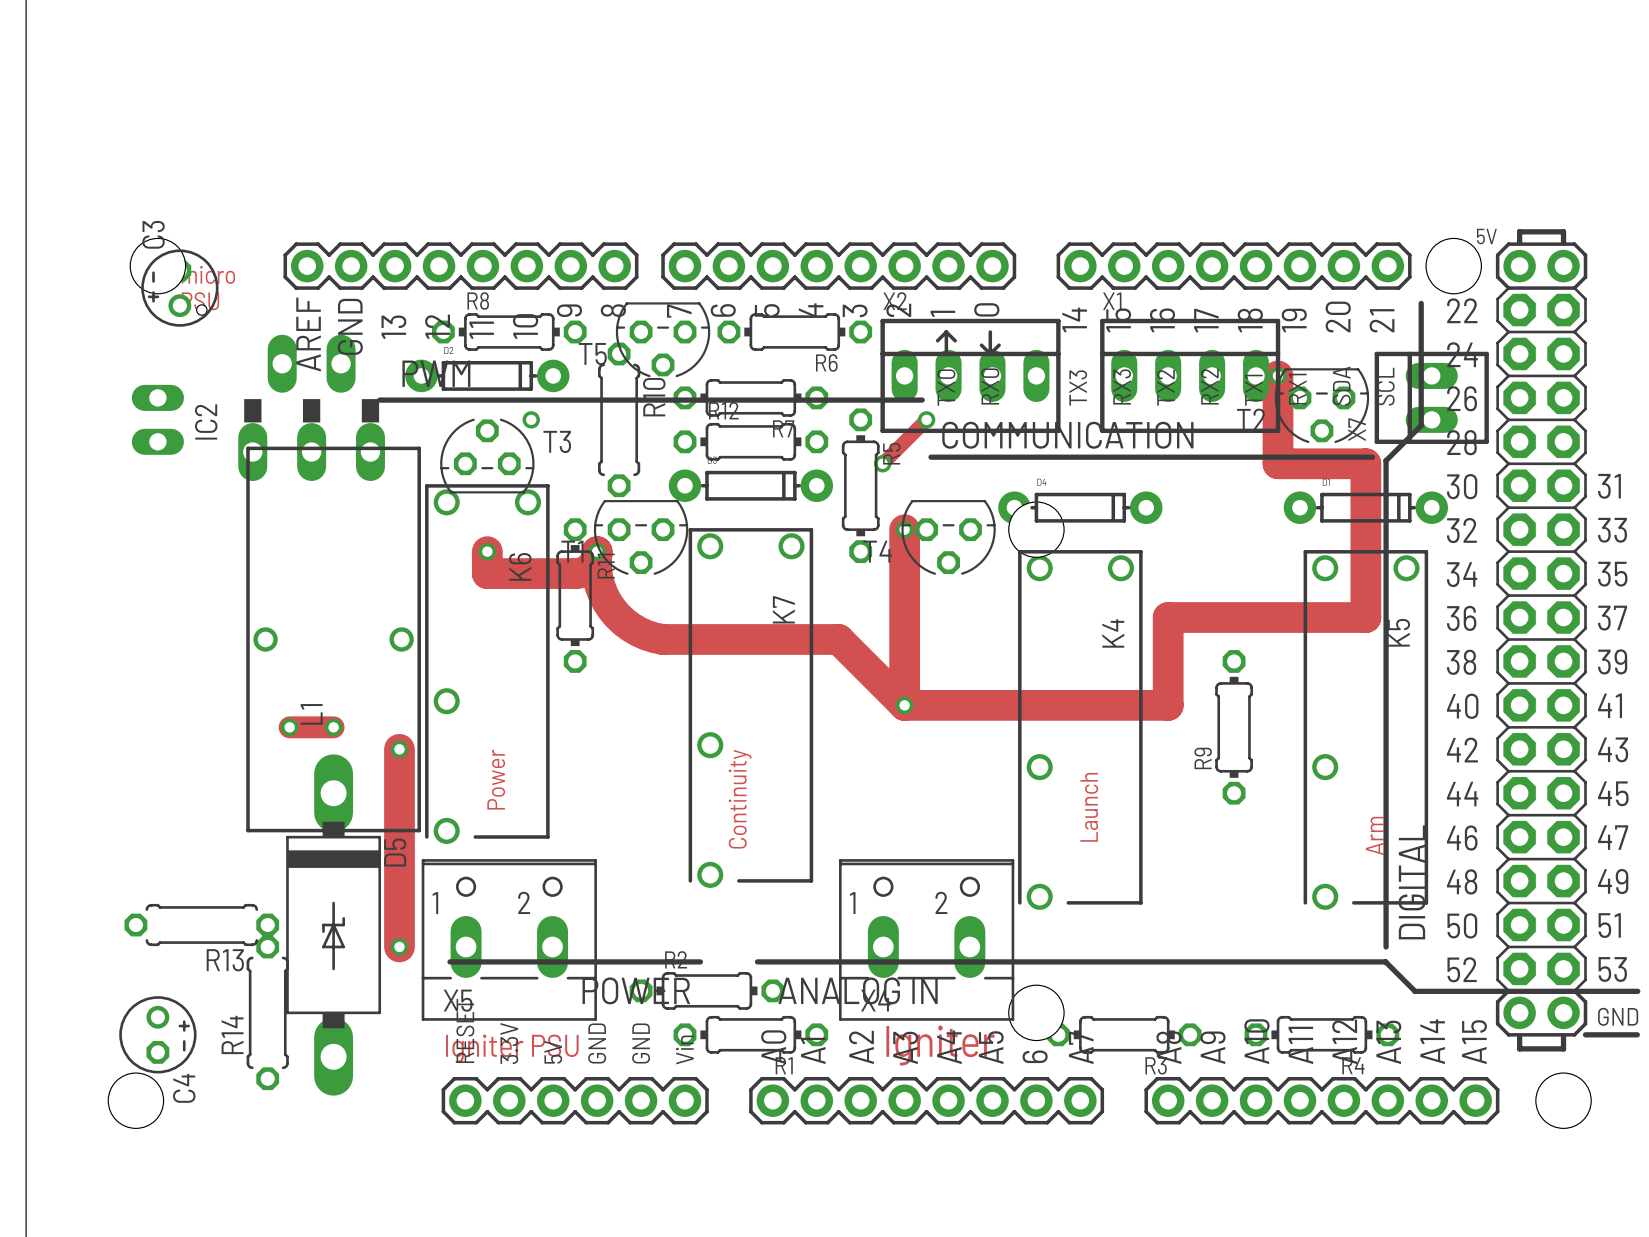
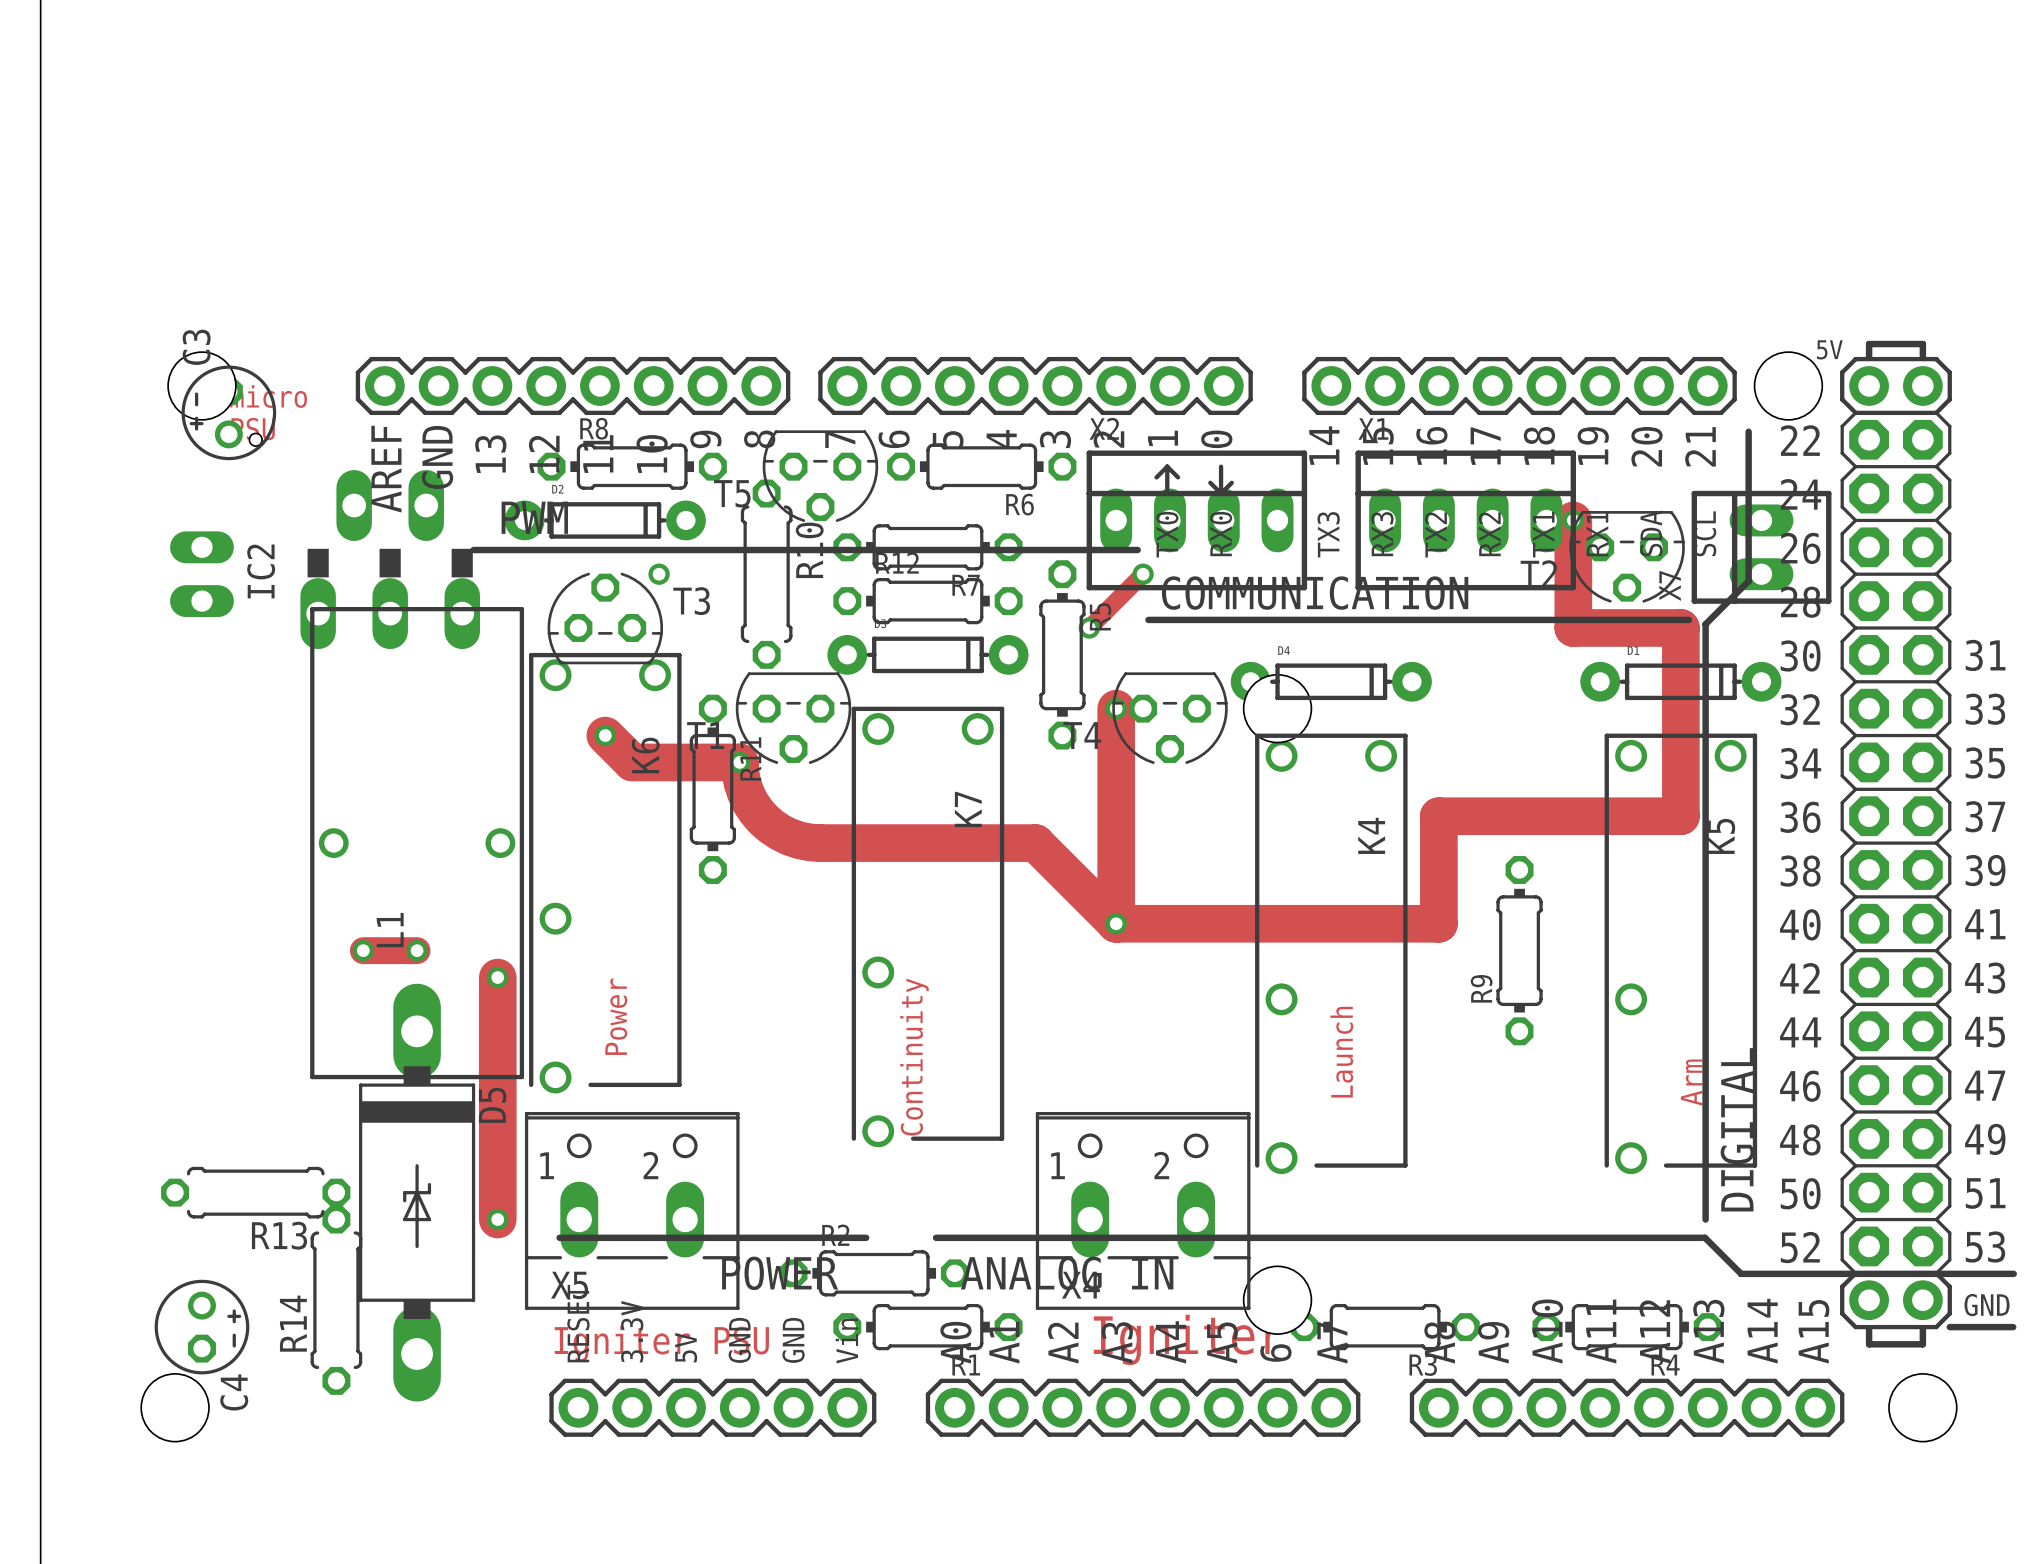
track: (487, 551) (487, 573) (509, 573) -> (605, 735) (632, 762)
via position: (597, 551) -> (739, 762)
track: (575, 573) (583, 571) (590, 567) (595, 560) (597, 551) (597, 577) (603, 594) (611, 609) (630, 627) (646, 635) (663, 639) -> (712, 762) (739, 762) (745, 793) (763, 819) (789, 836) (820, 843)

